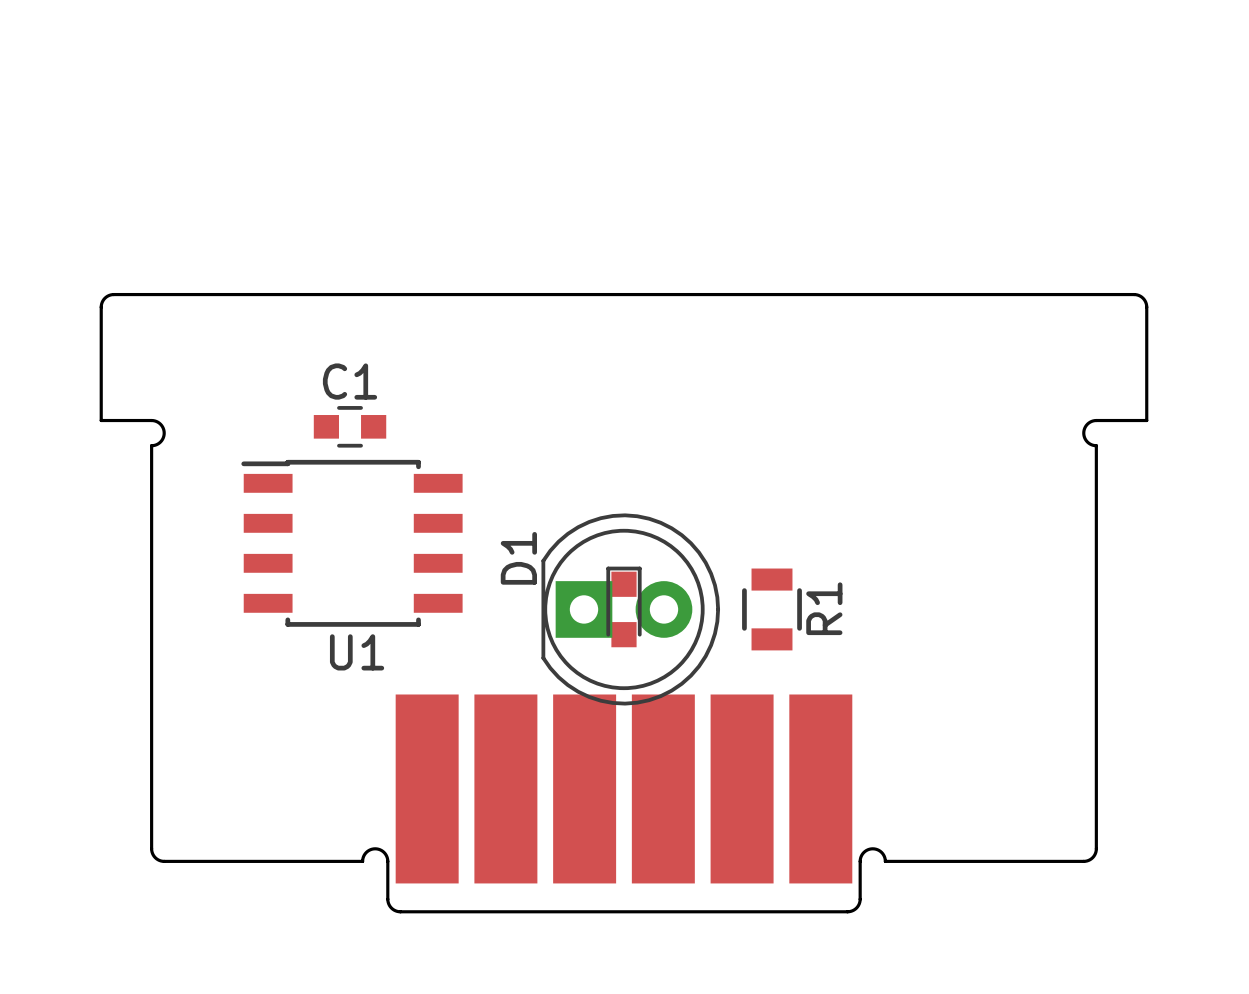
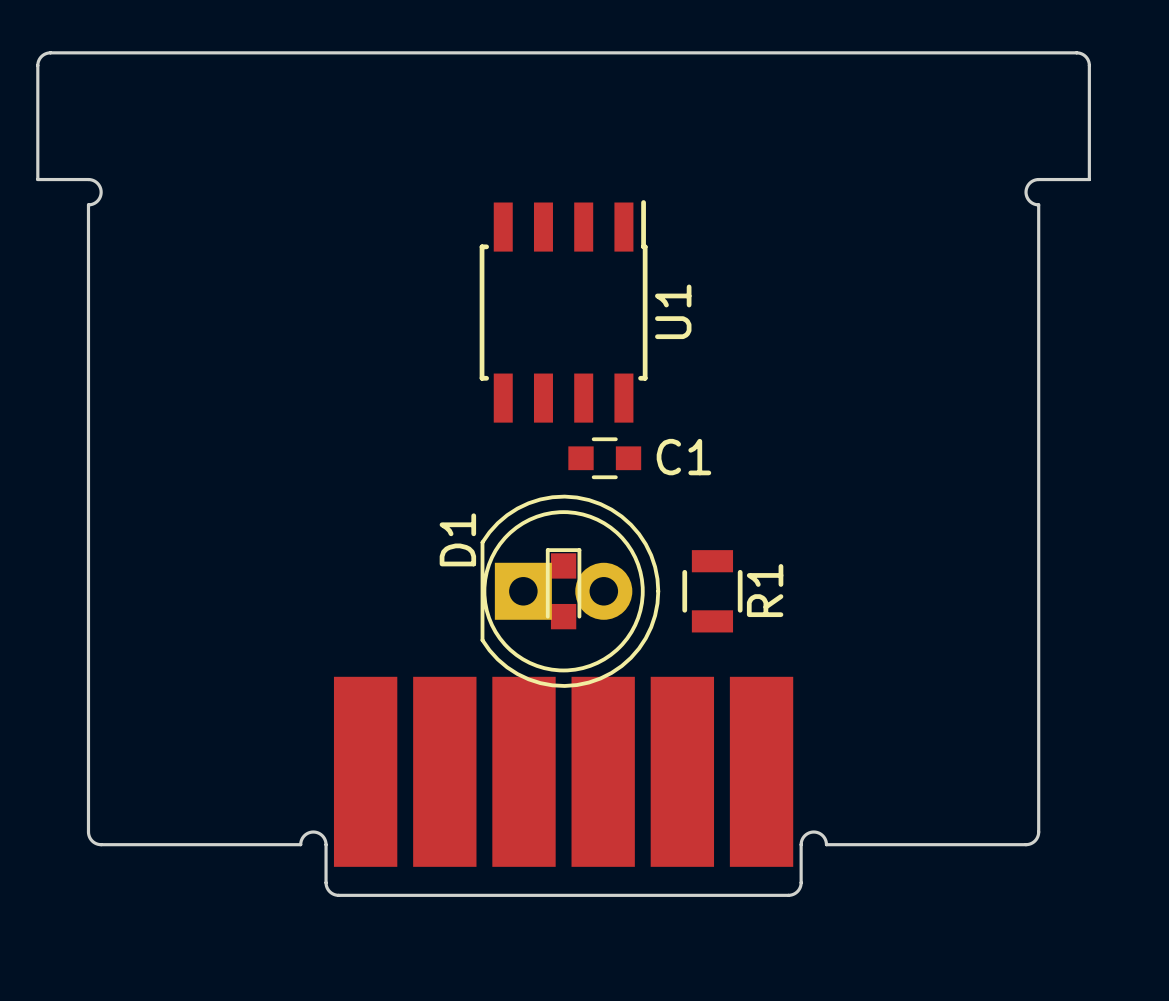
C1 name position: C1 (350, 381) -> C1 (683, 457)
C1 position: (350, 426) -> (604, 458)
board edge: (151, 445) (159, 443) (163, 436) (163, 428) (157, 422) (101, 420) (101, 305) (104, 298) (110, 294) (1137, 294) (1143, 298) (1146, 305) (1146, 420) (1090, 422) (1084, 428) (1084, 436) (1088, 443) (1096, 445) -> (88, 426) (88, 204) (97, 201) (101, 190) (97, 183) (90, 179) (37, 179) (37, 63) (41, 56) (48, 52) (1081, 53) (1086, 57) (1089, 65) (1089, 179) (1037, 179) (1029, 183) (1026, 190) (1028, 199) (1038, 204) (1038, 426)
U1 rotation: 0° (351, 543) -> 90° clockwise (563, 311)
U1 position: (351, 543) -> (563, 311)
U1 name position: U1 (357, 652) -> U1 (673, 311)

